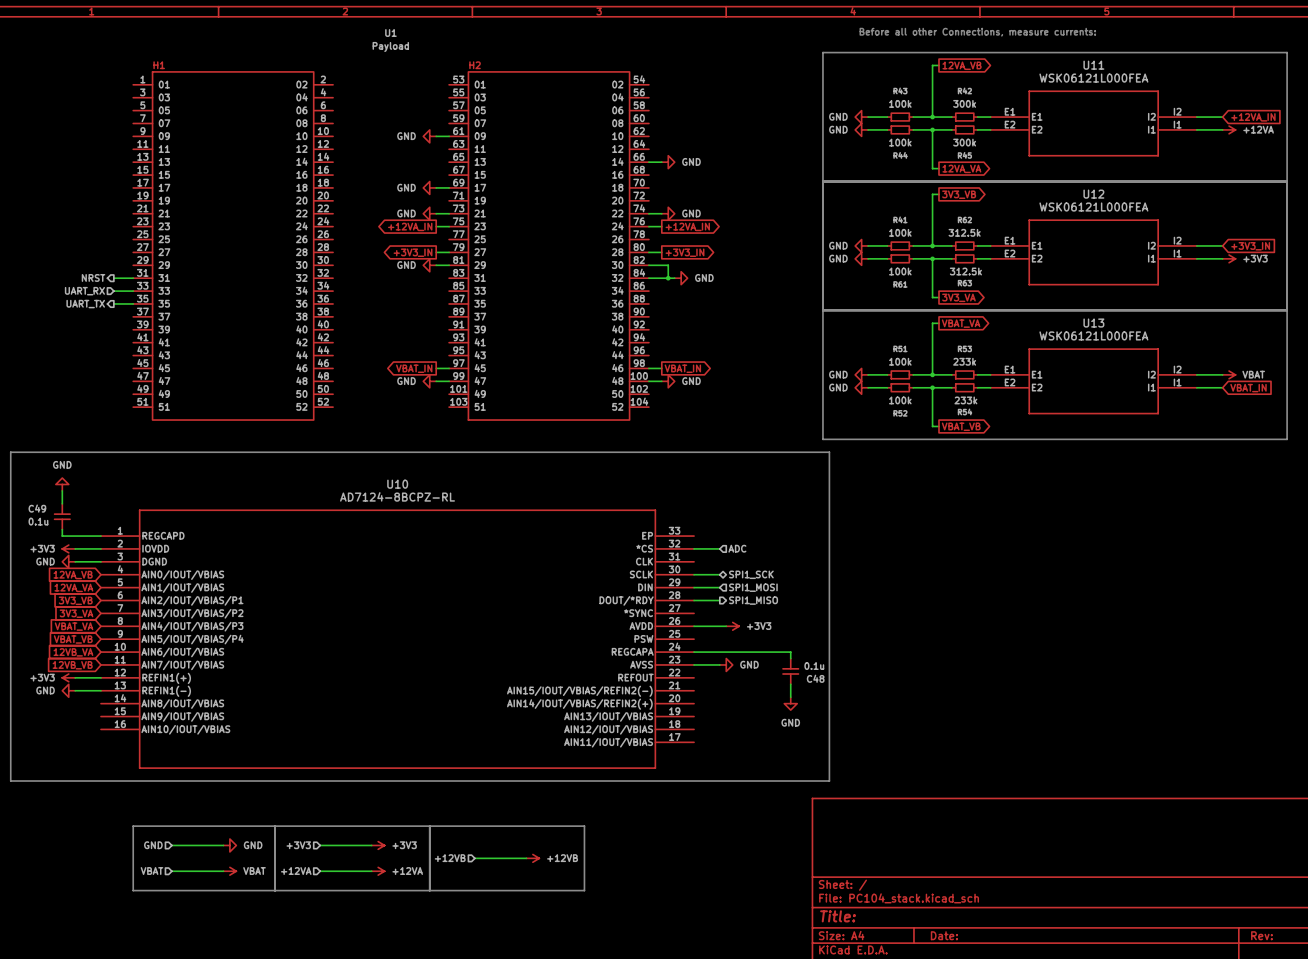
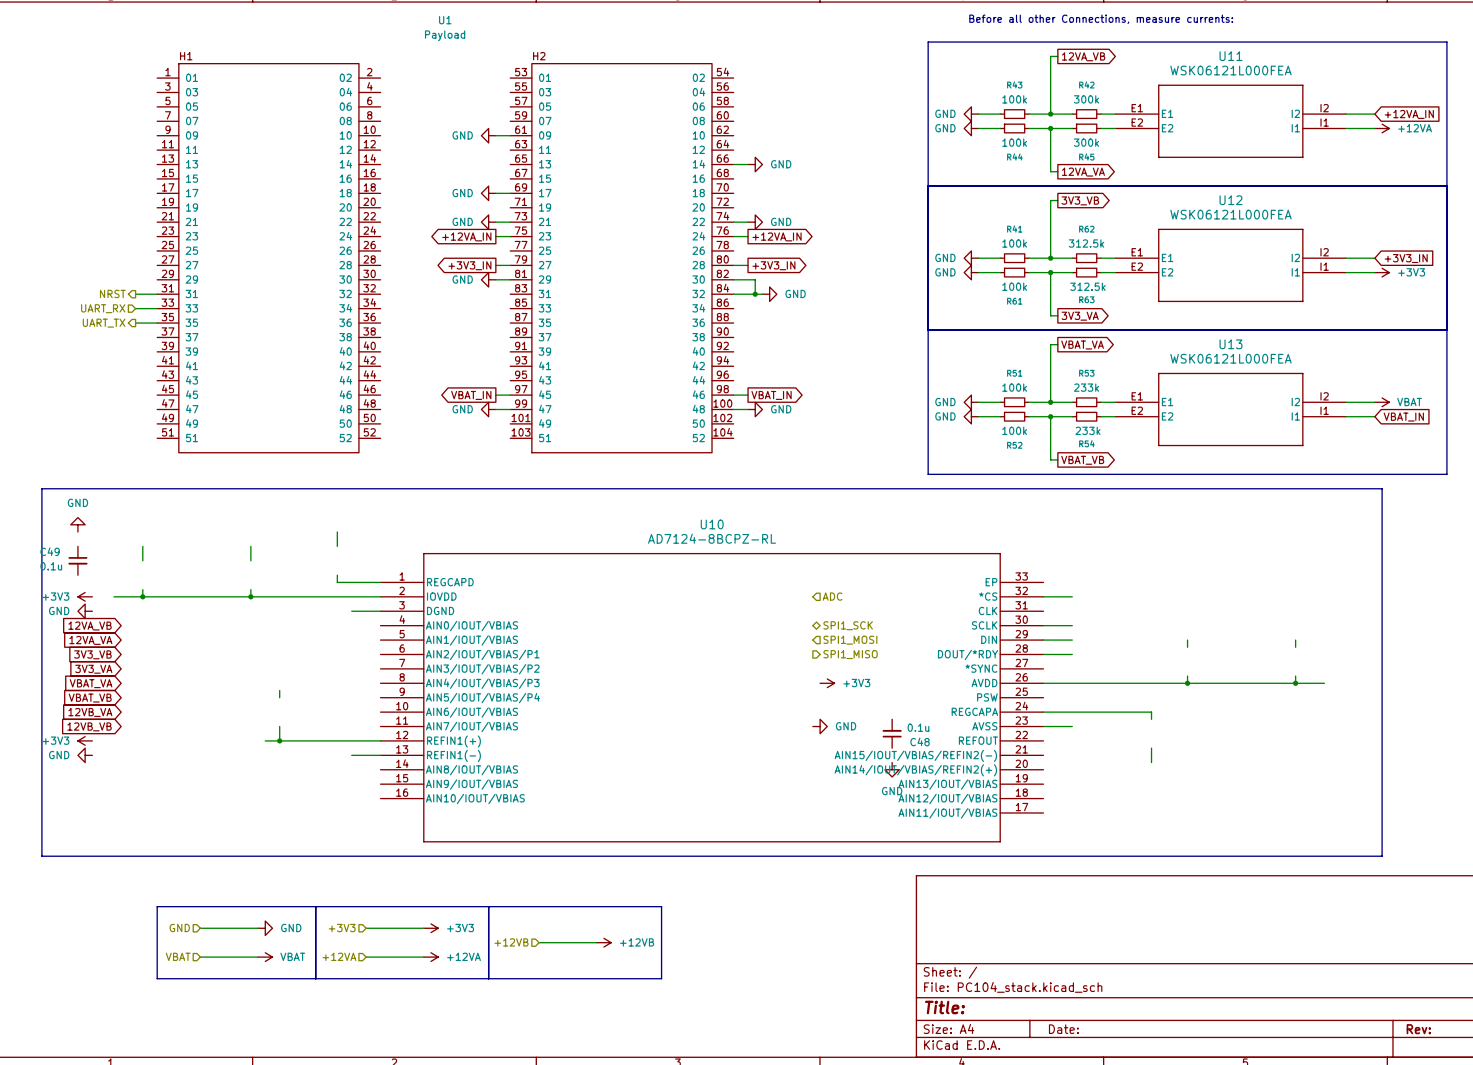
line: (30, 452) (10, 452) (10, 781) (30, 781) -> (41, 488) (41, 856)
line: (829, 452) (829, 781) -> (935, 488) (1382, 488) (1382, 856) (935, 856)
wire: (62, 490) (62, 503) -> (142, 546) (142, 560)
wire: none -> (337, 531) (337, 546)
wire: none -> (250, 546) (250, 560)
wire: (62, 529) (62, 536) (100, 536) -> none
wire: none -> (337, 575) (337, 582) (380, 582)
wire: none -> (142, 589) (142, 596)
wire: none -> (250, 589) (250, 596)
wire: (75, 548) (94, 548) -> none
wire: none -> (121, 596) (380, 596)
junction: none -> (142, 596)
junction: none -> (250, 596)
wire: (694, 548) (719, 548) -> none
wire: none -> (1043, 596) (1072, 596)
wire: (75, 561) (100, 561) -> none
wire: none -> (351, 611) (380, 611)
wire: (694, 574) (719, 574) -> none
wire: none -> (1043, 625) (1072, 625)
wire: (694, 587) (719, 587) -> none
wire: none -> (1043, 640) (1072, 640)
wire: none -> (1187, 640) (1187, 647)
wire: none -> (1295, 640) (1295, 647)
wire: (694, 600) (719, 600) -> none
wire: none -> (1043, 654) (1072, 654)
wire: none -> (1187, 676) (1187, 683)
wire: none -> (1295, 676) (1295, 683)
wire: (694, 626) (726, 626) -> none
wire: none -> (1043, 683) (1324, 683)
junction: none -> (1187, 683)
junction: none -> (1295, 683)
wire: none -> (279, 690) (279, 697)
U10 position: (397, 639) -> (712, 697)
wire: (694, 652) (790, 652) (790, 658) -> none
wire: none -> (1043, 712) (1151, 712) (1151, 719)
wire: none -> (279, 726) (279, 740)
wire: (694, 664) (719, 664) -> none
wire: none -> (1043, 726) (1072, 726)
wire: (75, 677) (100, 677) -> none
wire: none -> (265, 740) (380, 740)
junction: none -> (279, 740)
wire: (790, 684) (790, 697) -> none
wire: none -> (1151, 748) (1151, 762)
wire: (75, 690) (100, 690) -> none
wire: none -> (351, 755) (380, 755)

